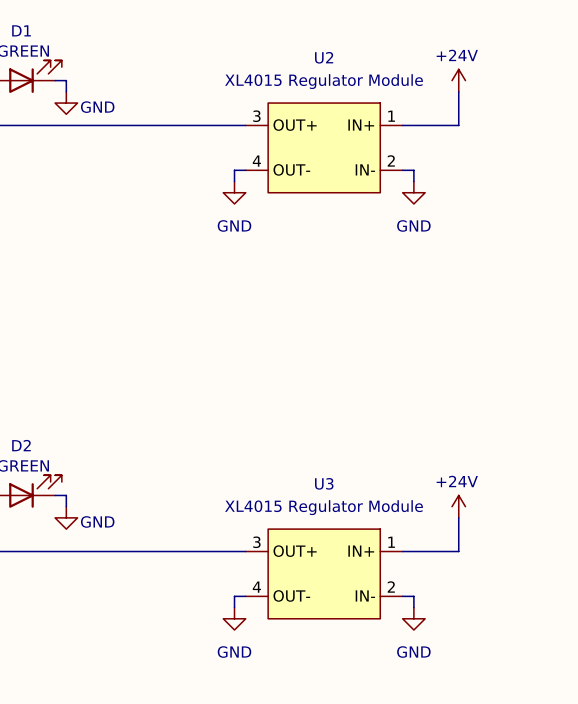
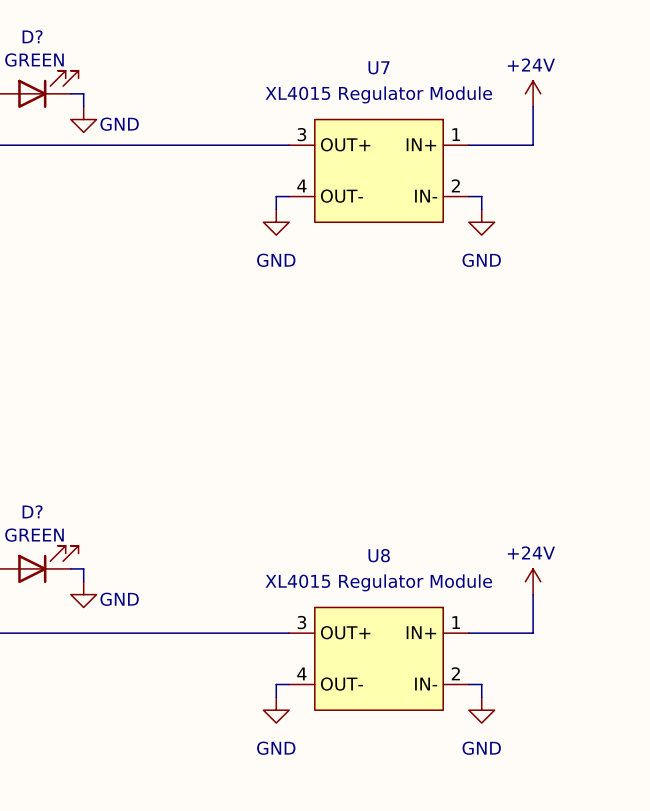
D1 name: D1 (21, 30) -> D? (32, 36)
U2 name: U2 (324, 57) -> U7 (379, 67)
D2 name: D2 (21, 445) -> D? (32, 511)
U3 name: U3 (324, 483) -> U8 (379, 555)

